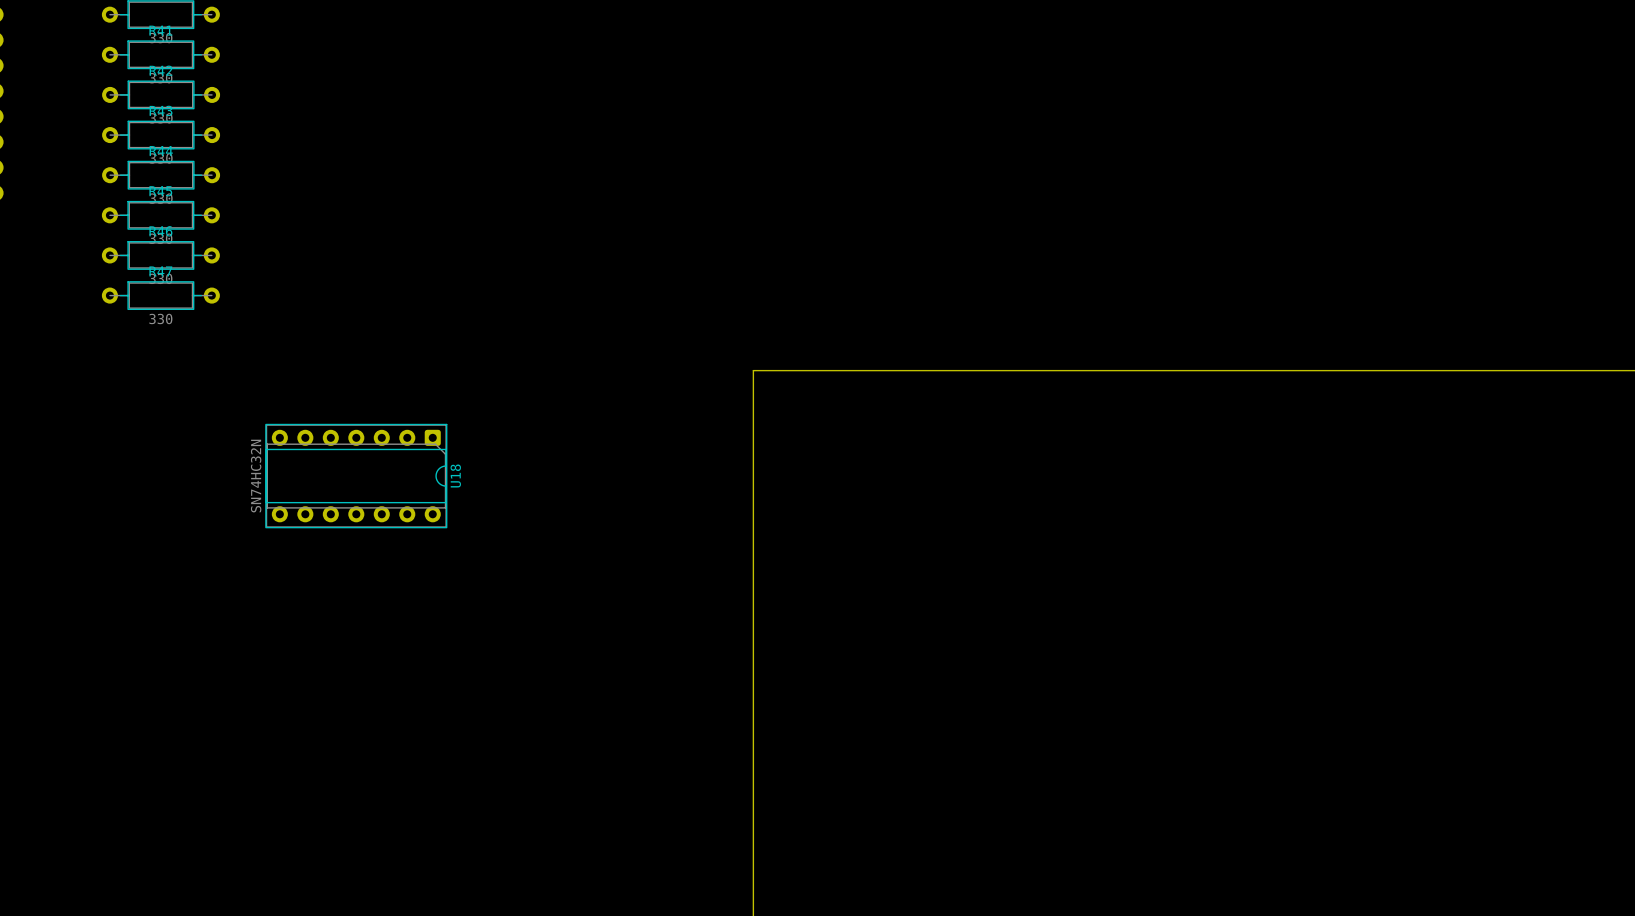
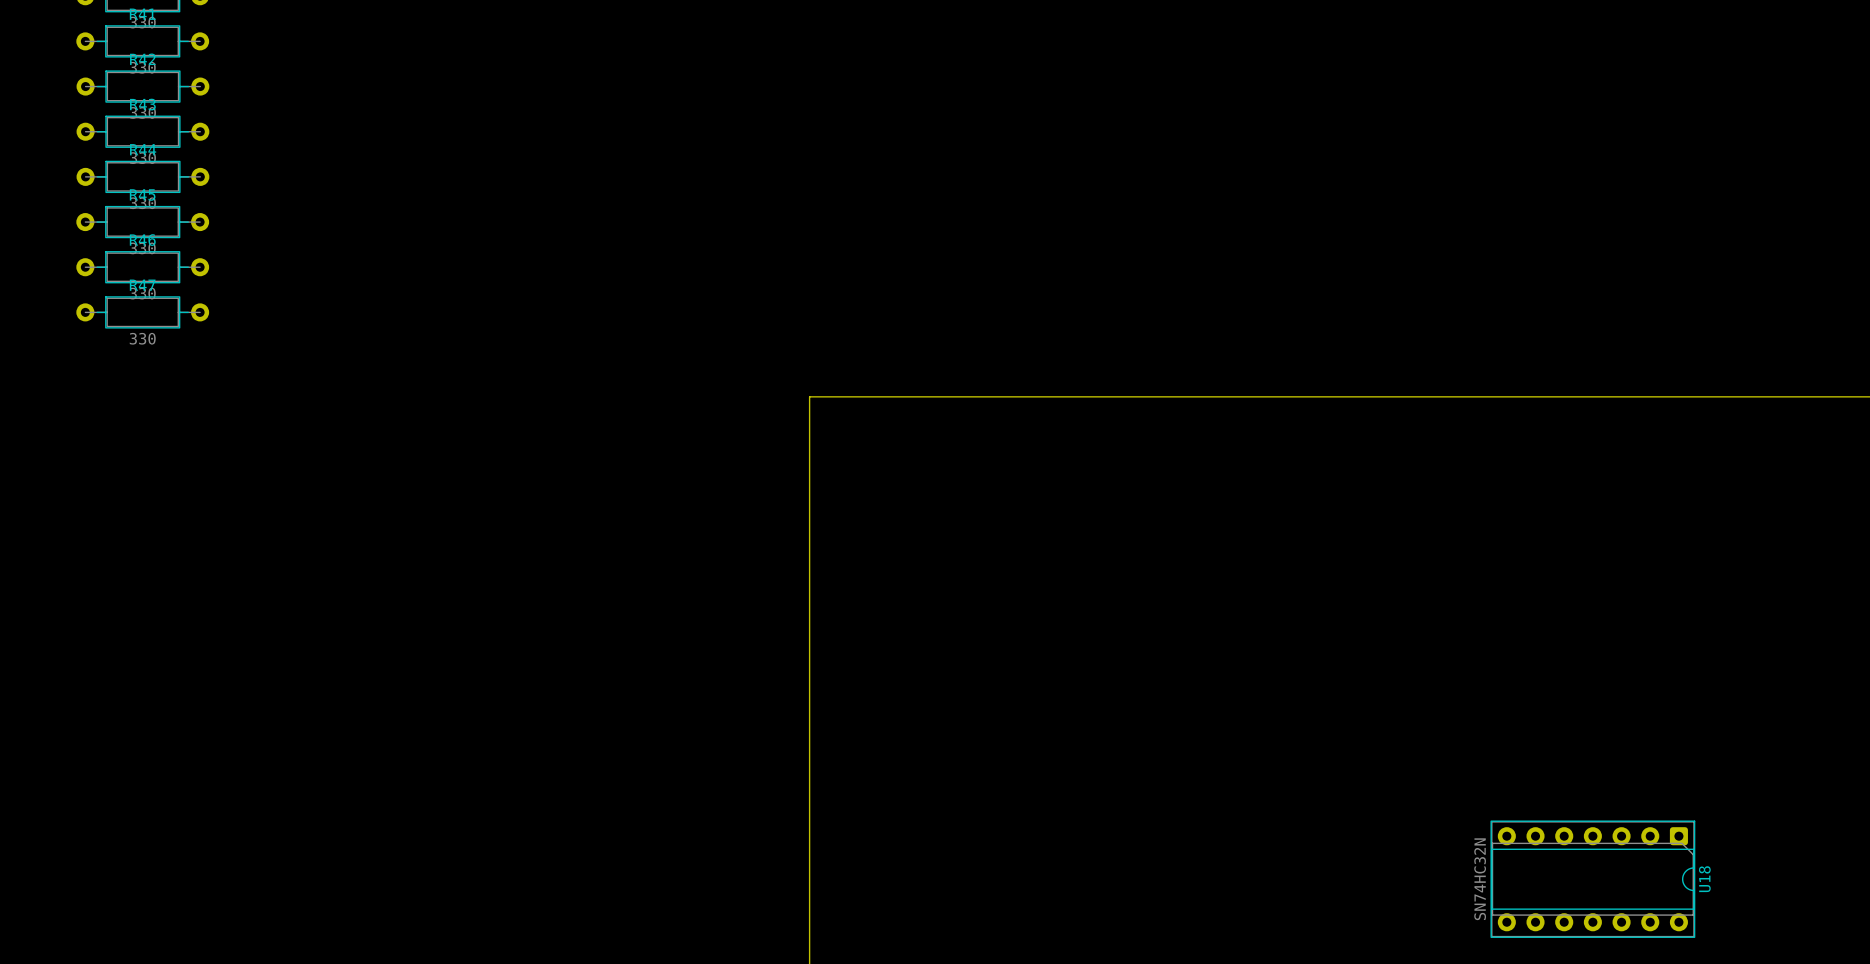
U18 position: (356, 476) -> (1592, 879)

